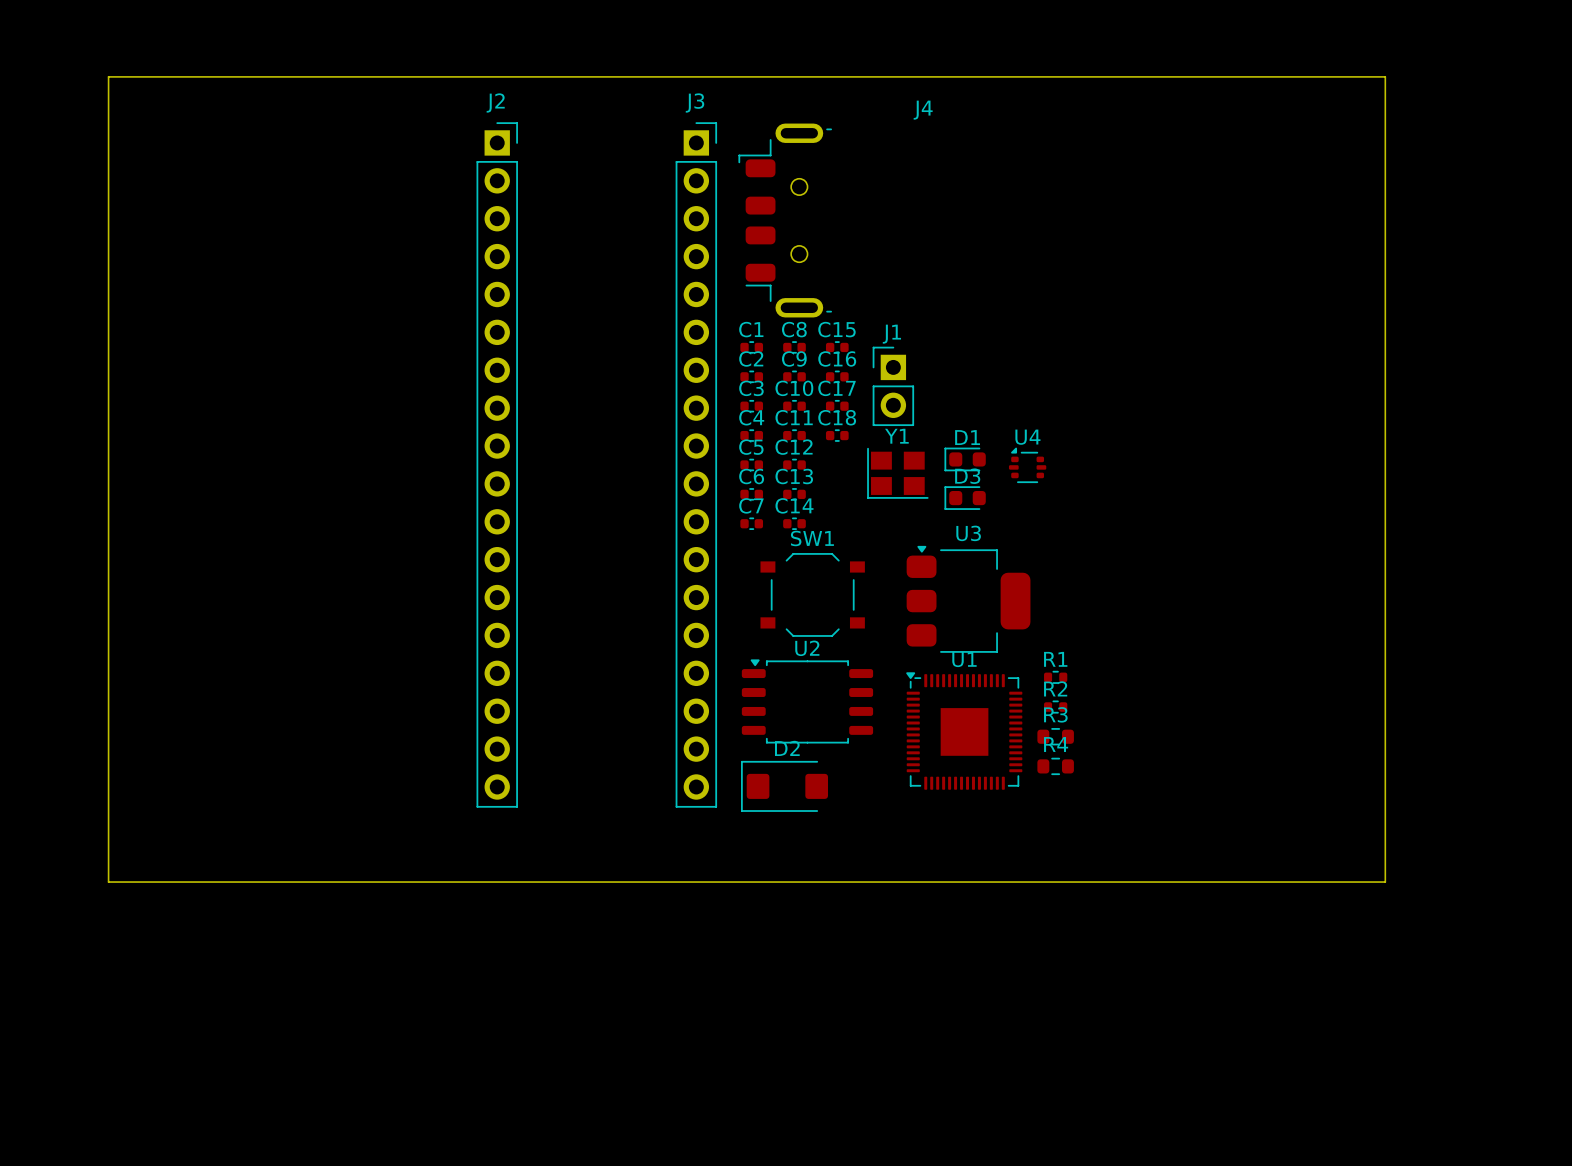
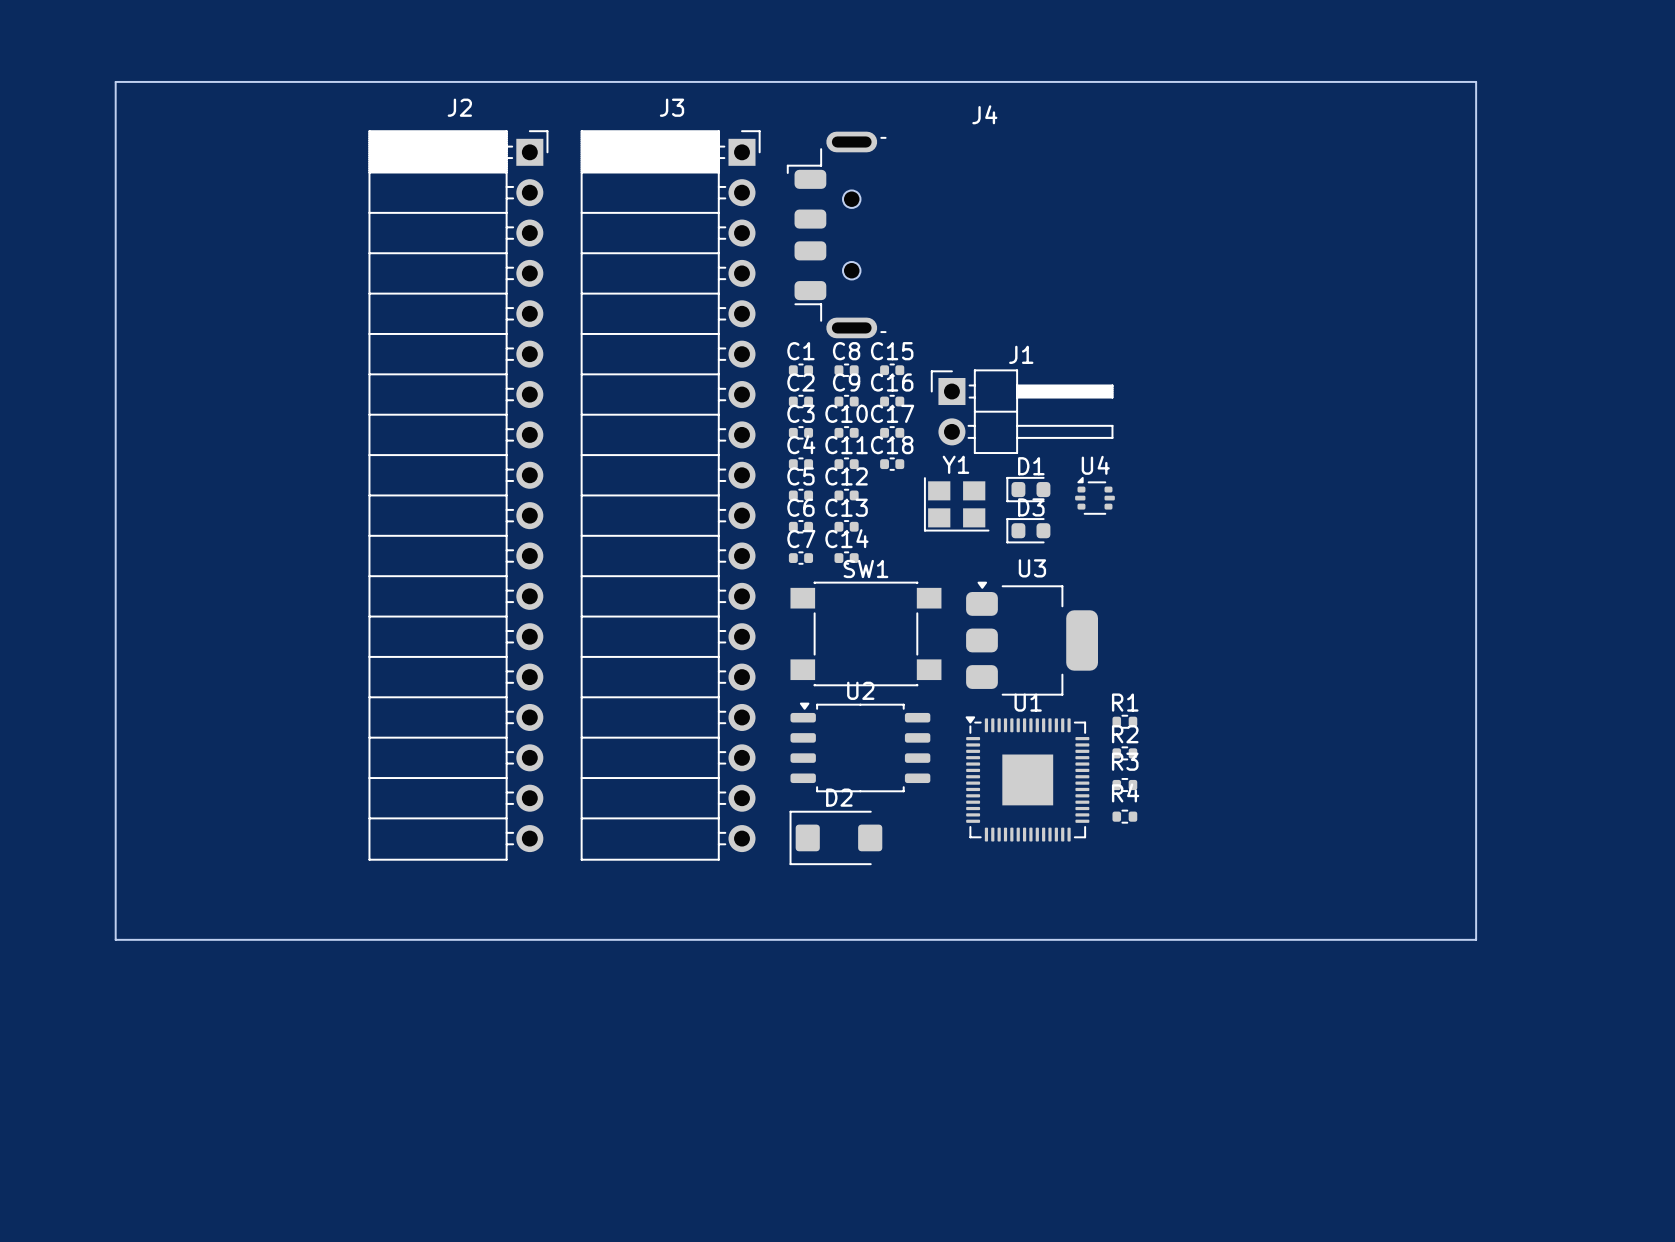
J2 footprint: [476, 122, 518, 808] -> [368, 130, 549, 861]
J3 footprint: [675, 122, 718, 808] -> [580, 130, 761, 861]
J1 footprint: [872, 346, 915, 427] -> [930, 369, 1114, 454]
SW1 footprint: [760, 553, 865, 637] -> [790, 581, 942, 687]
R3 footprint: [1037, 728, 1074, 746] -> [1112, 778, 1138, 793]
R4 footprint: [1037, 757, 1074, 776] -> [1112, 809, 1138, 824]

